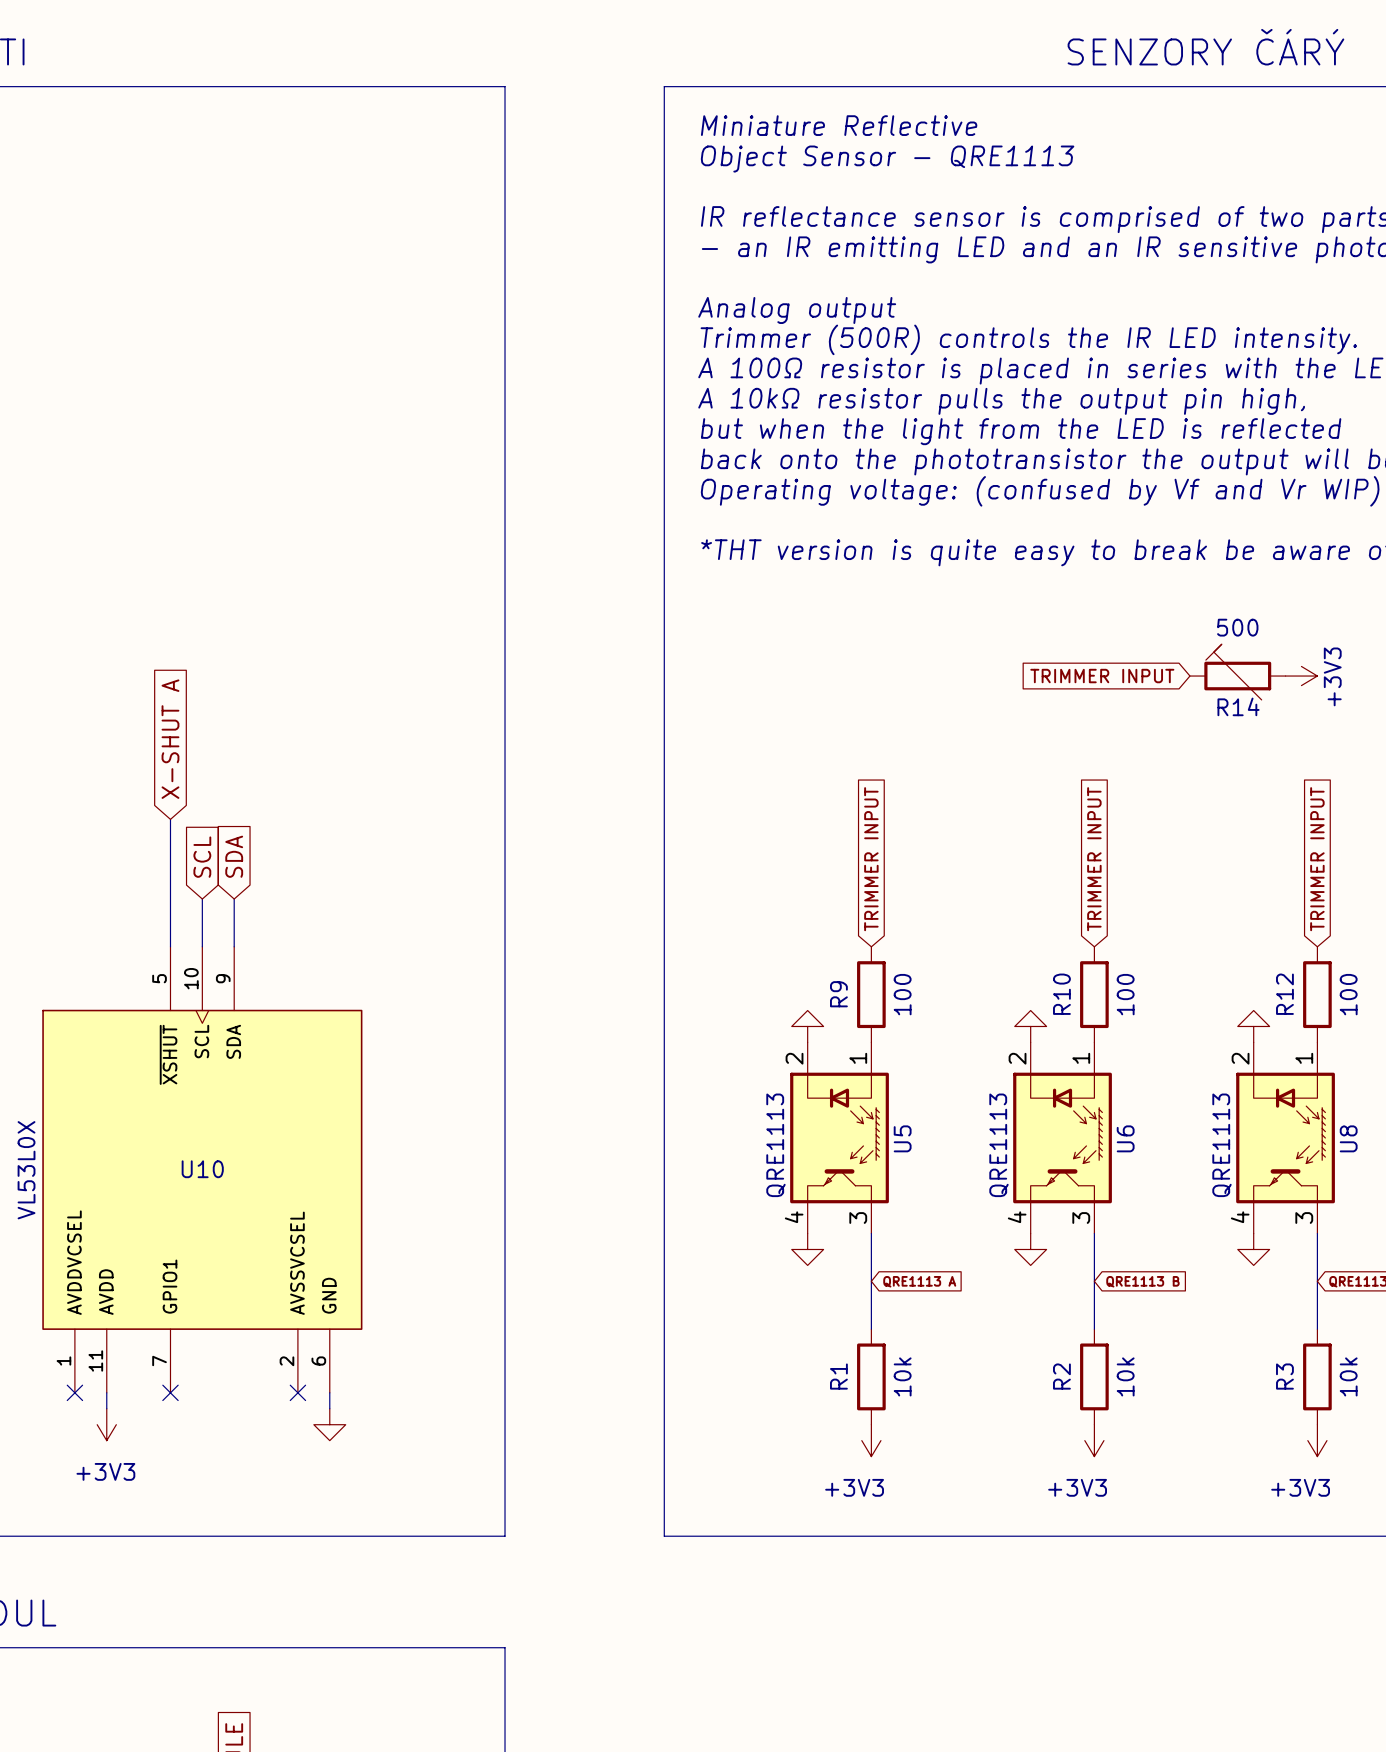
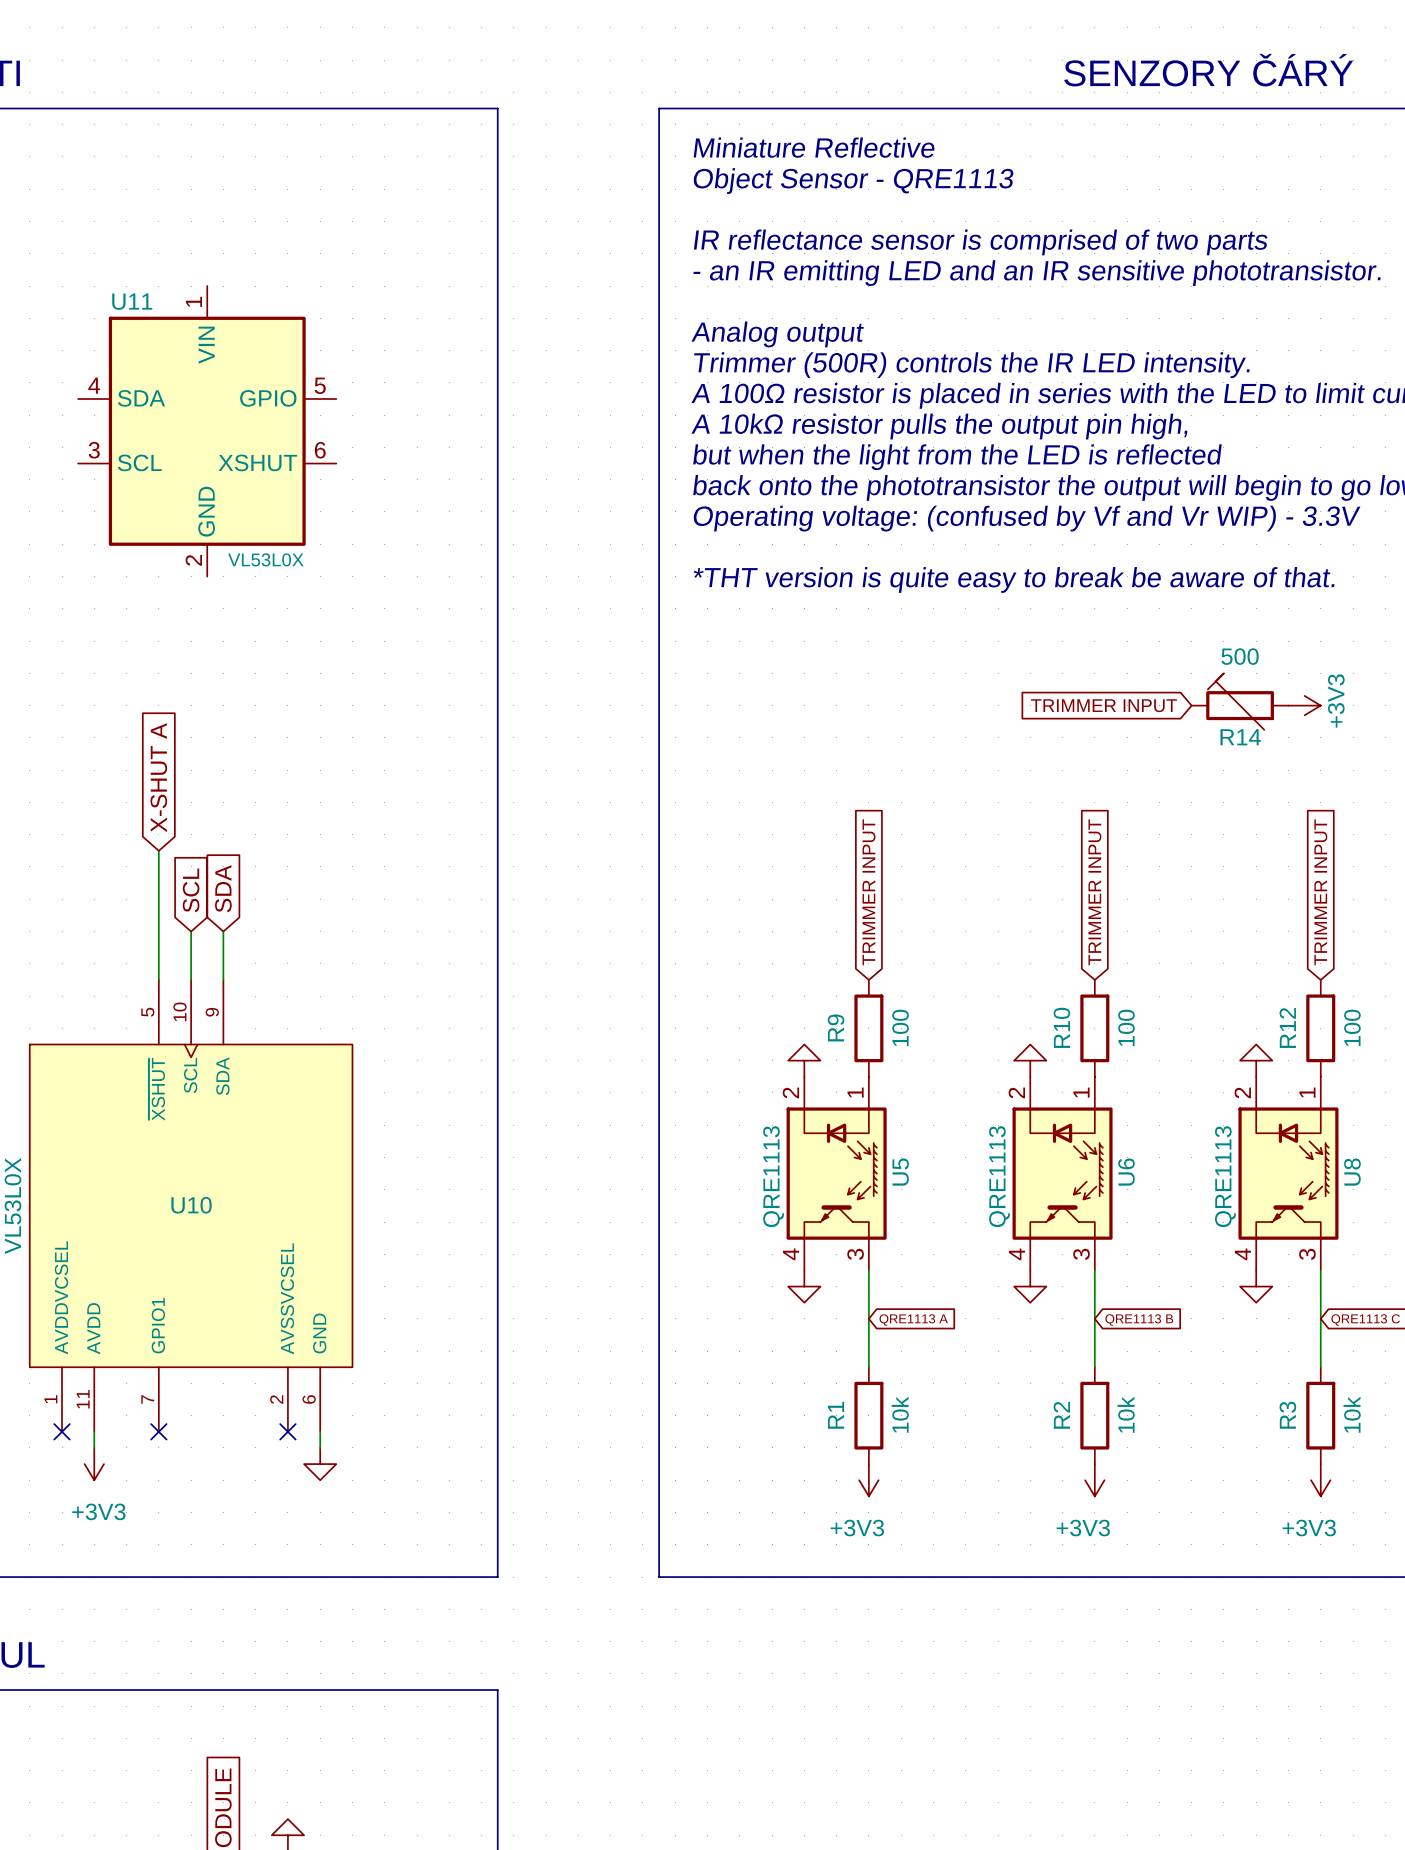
U11: none -> VL53L0X (207, 431)

